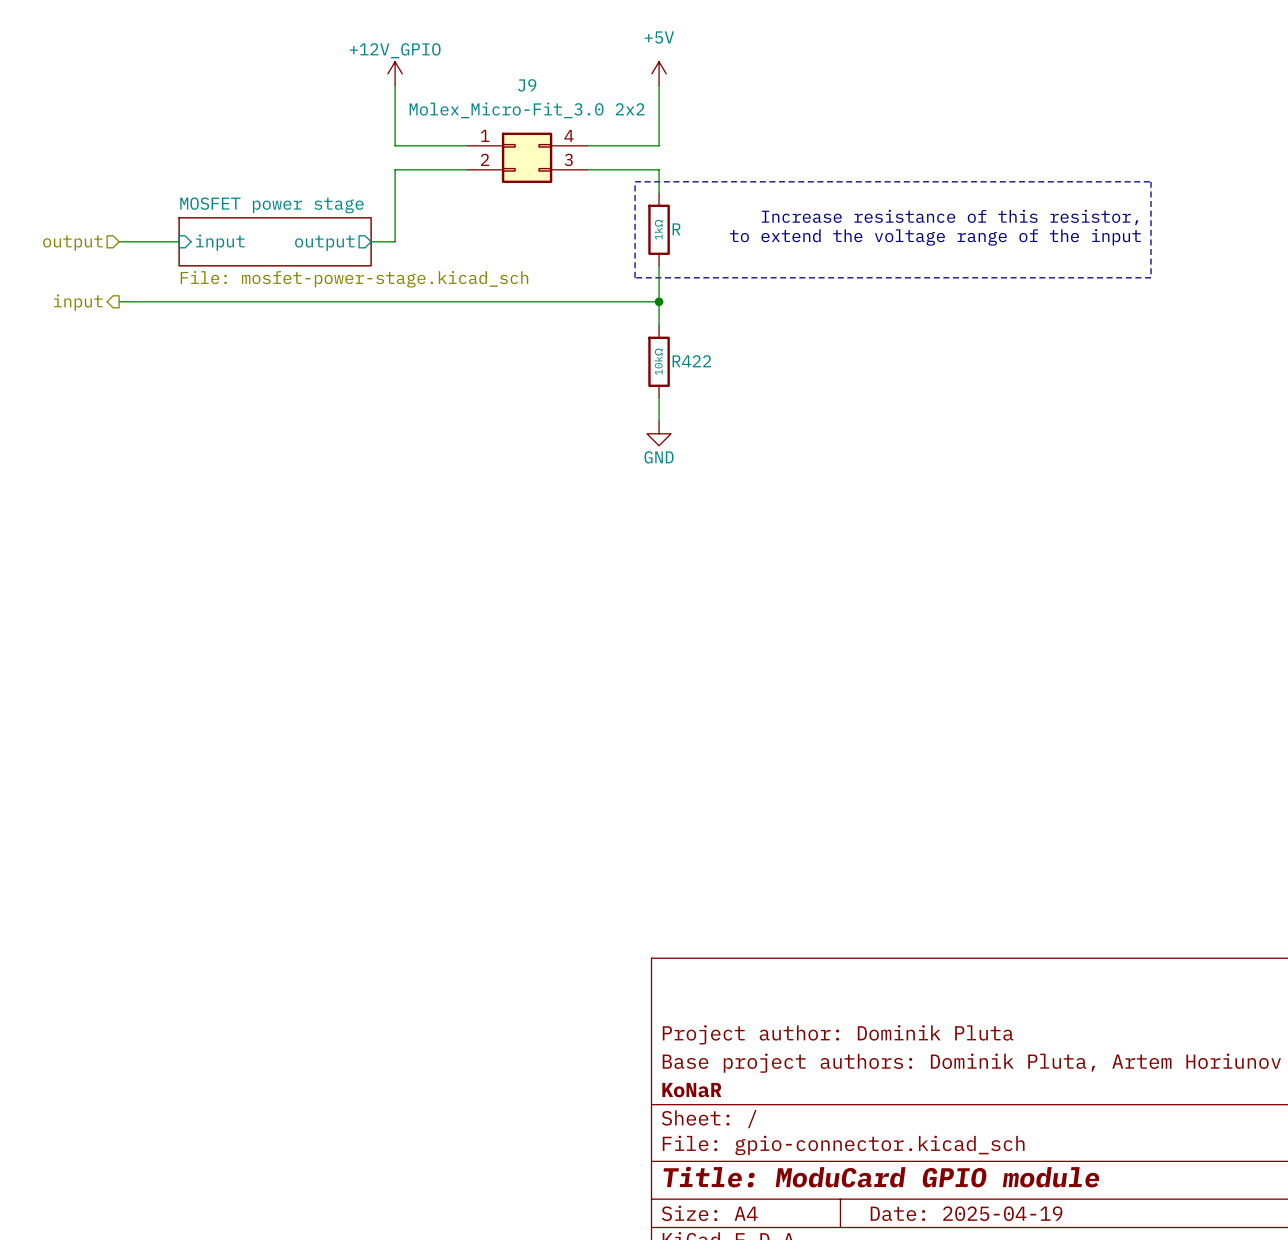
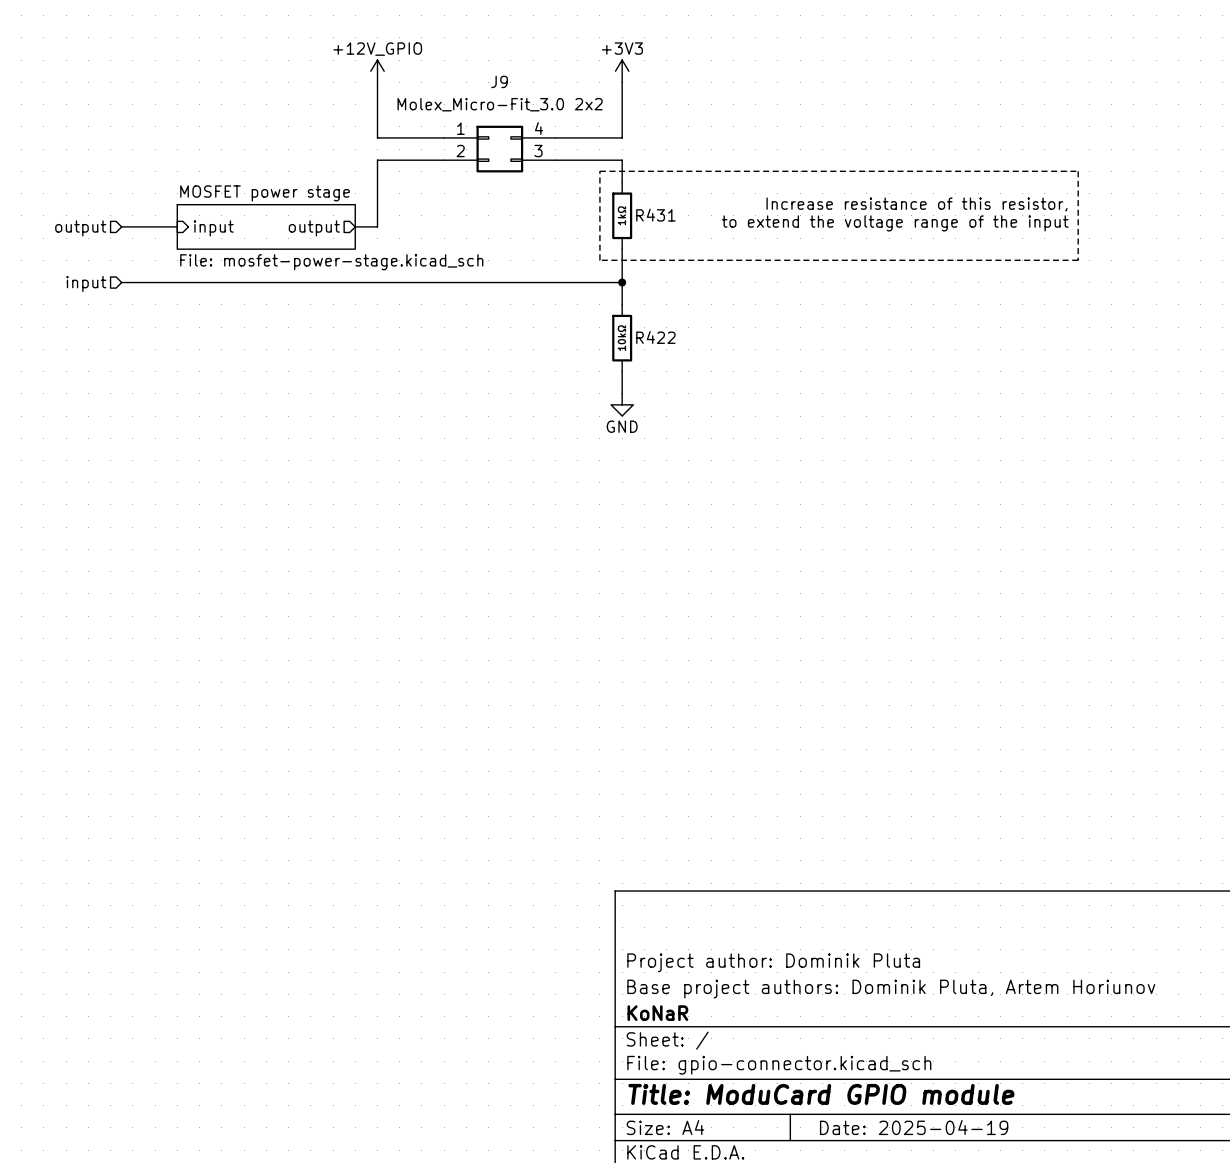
power symbol: +5V (659, 73) -> +3V3 (622, 71)
R name: R (676, 229) -> R431 (655, 215)
hierarchical label shape: output (78, 302) -> input (86, 283)

